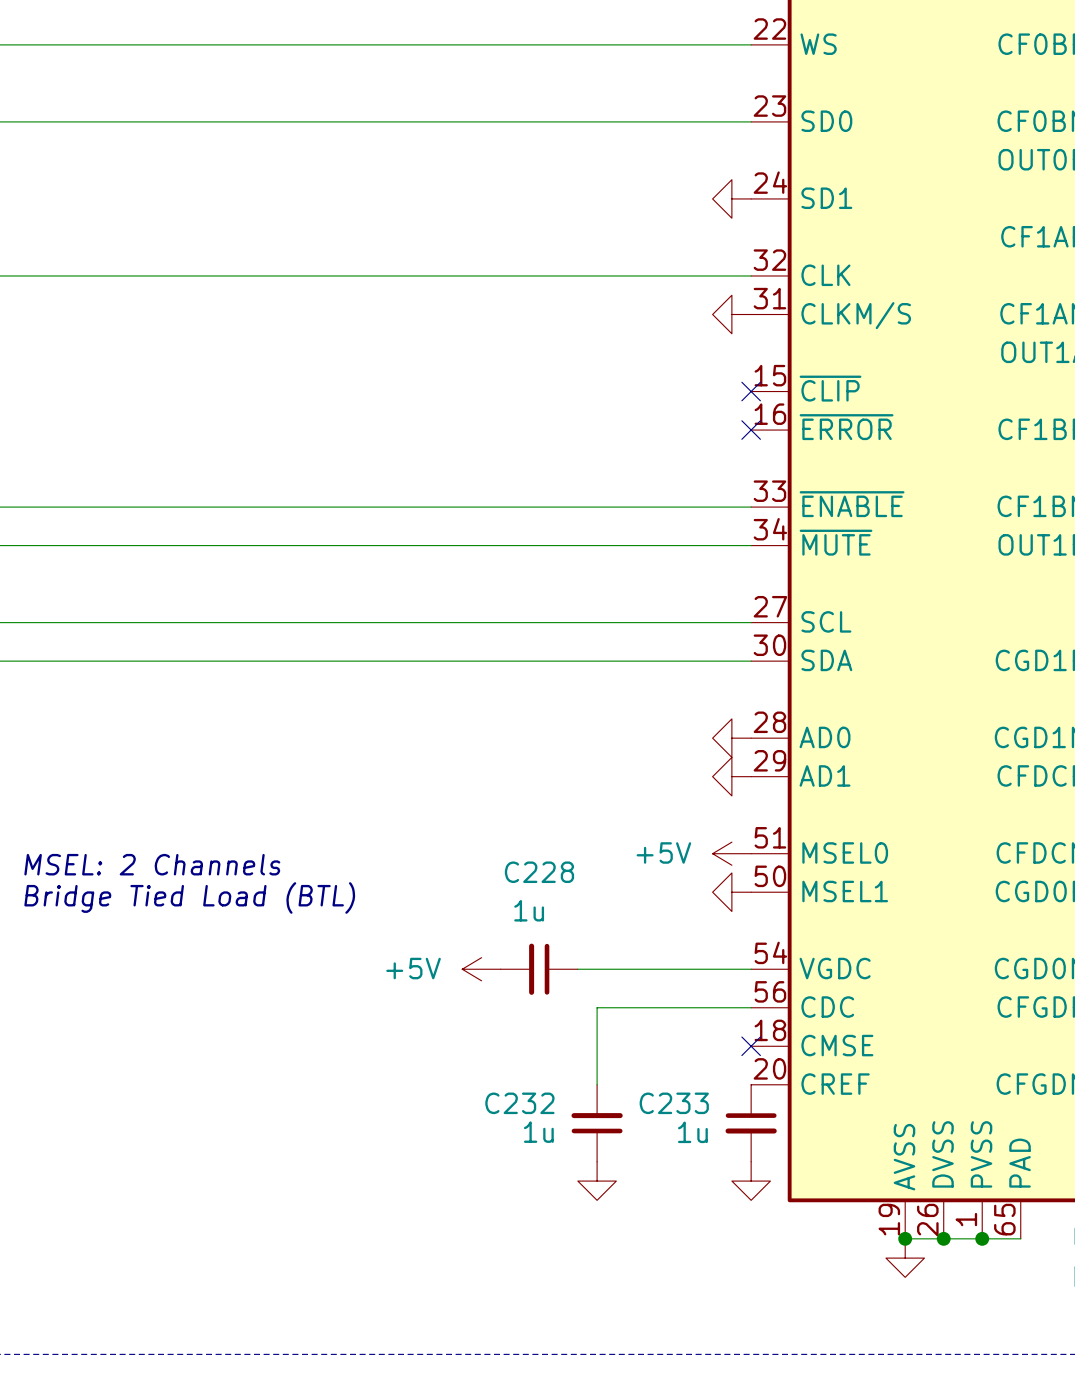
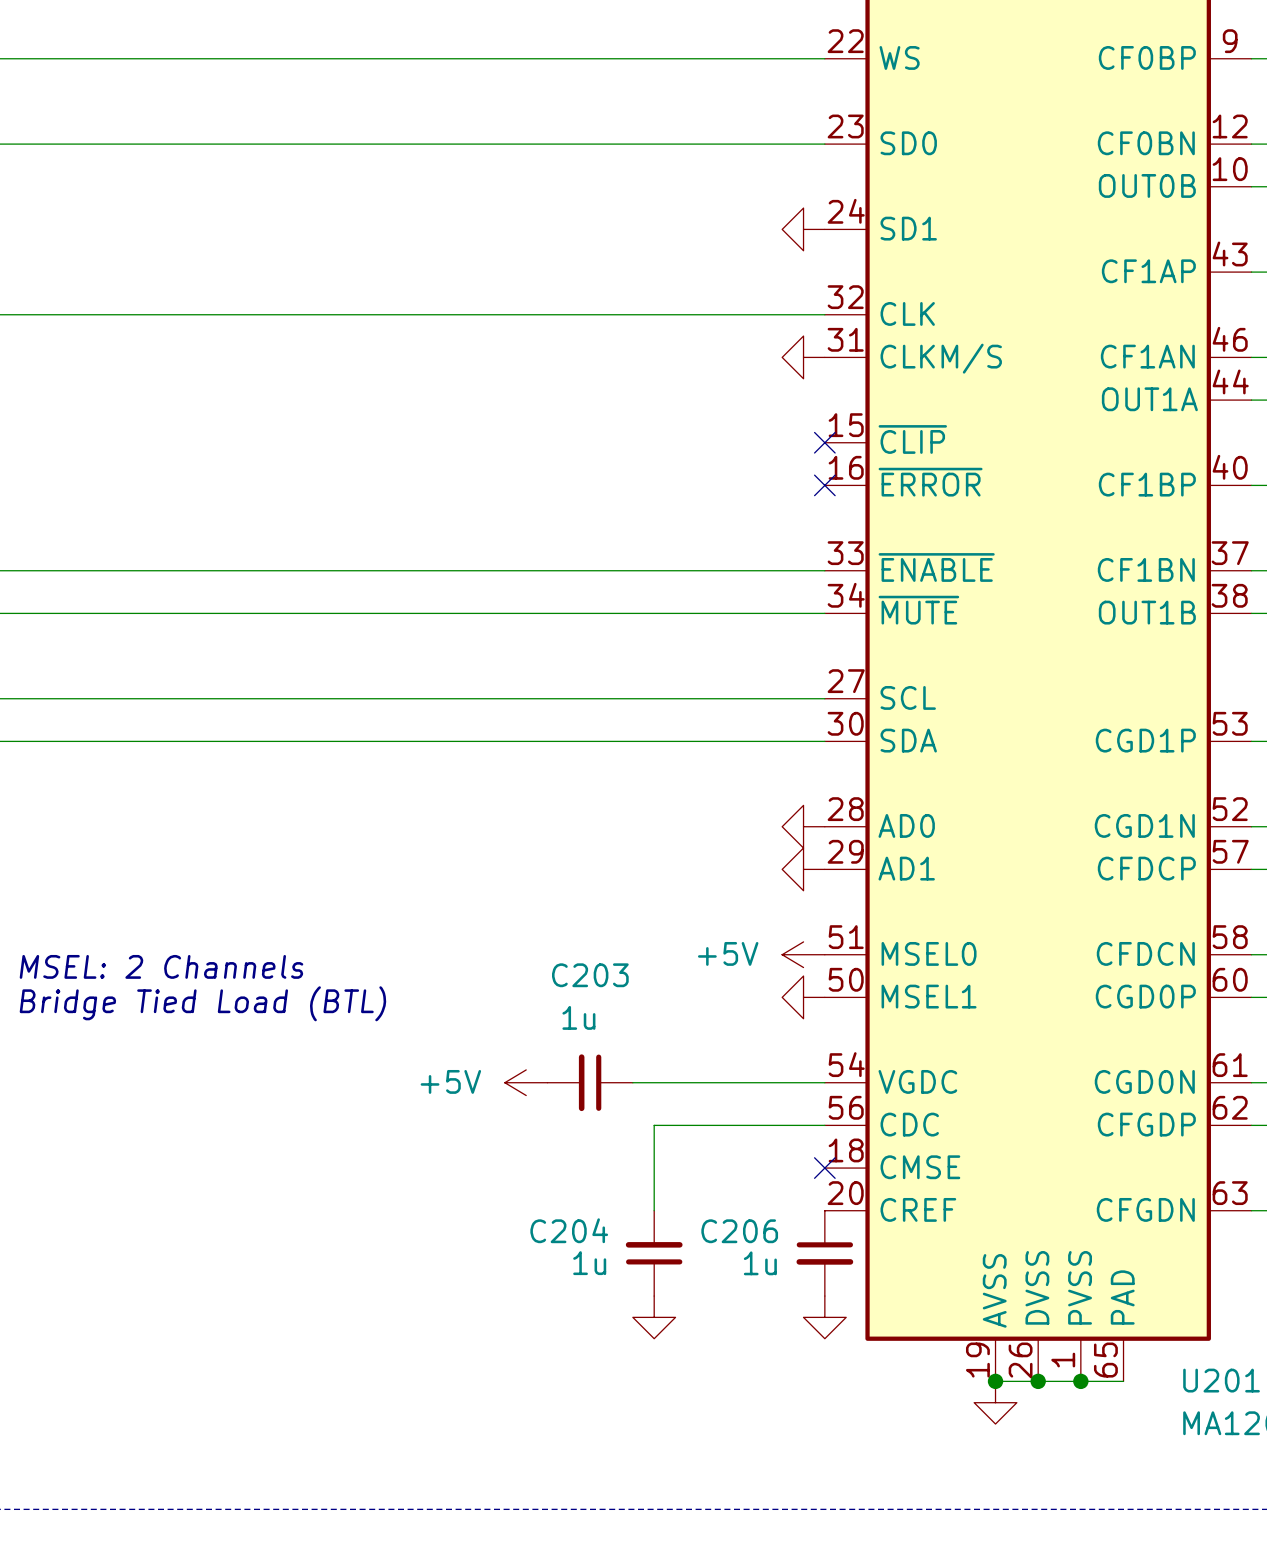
C228 name: C228 (539, 872) -> C203 (590, 975)
C232 name: C232 (519, 1103) -> C204 (569, 1230)
C233 name: C233 (674, 1103) -> C206 (739, 1231)

